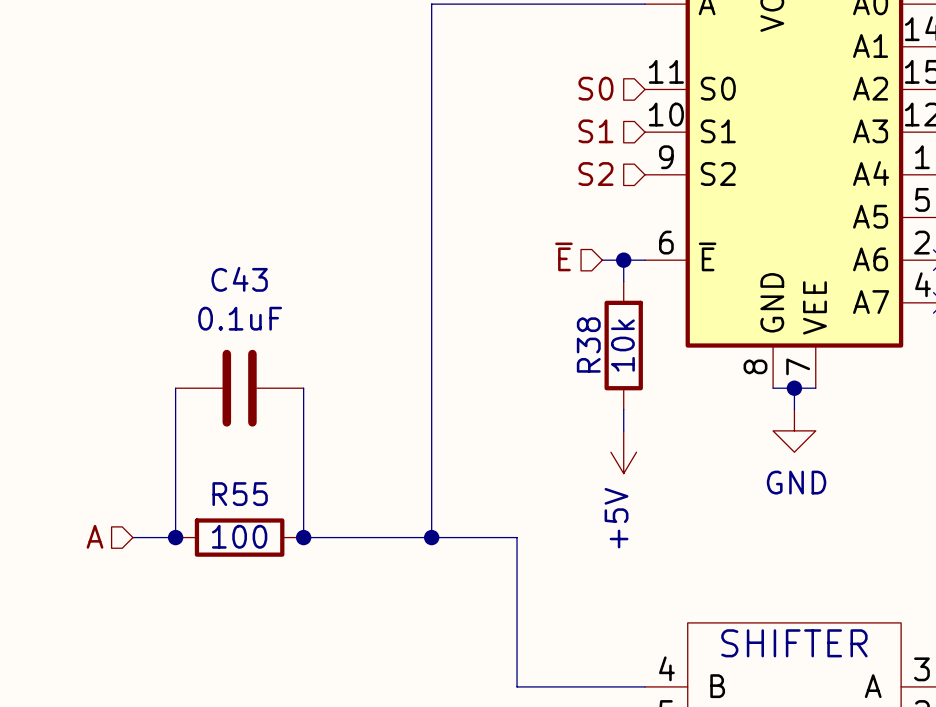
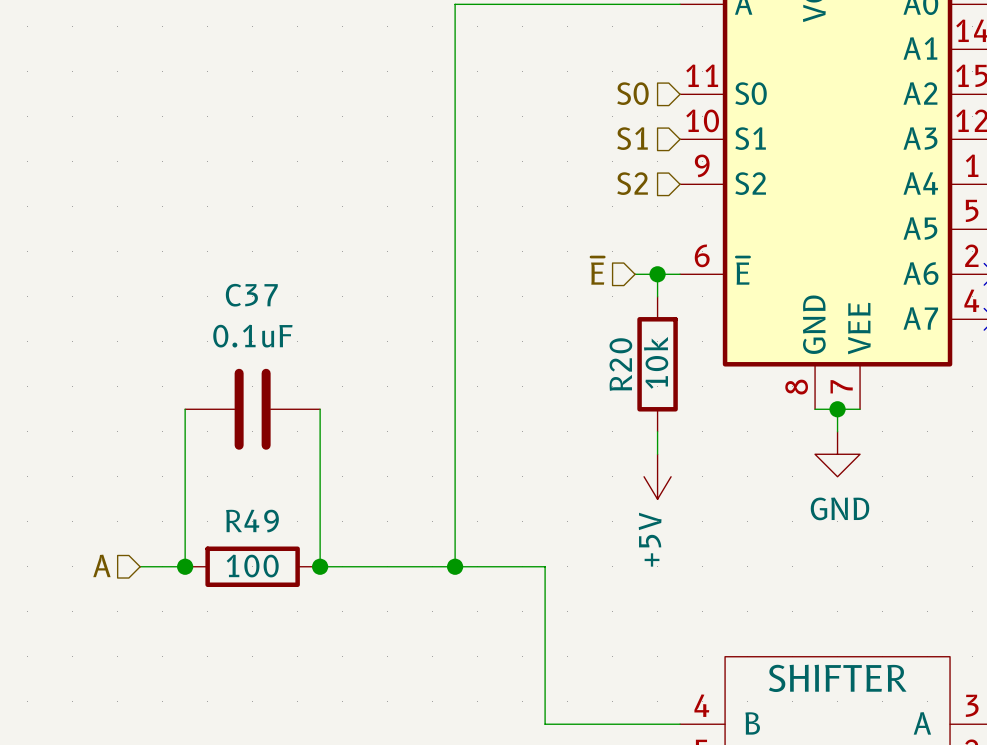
C43 name: C43 (239, 279) -> C37 (251, 295)
R38 name: R38 (588, 345) -> R20 (620, 364)
R55 name: R55 (240, 494) -> R49 (252, 521)

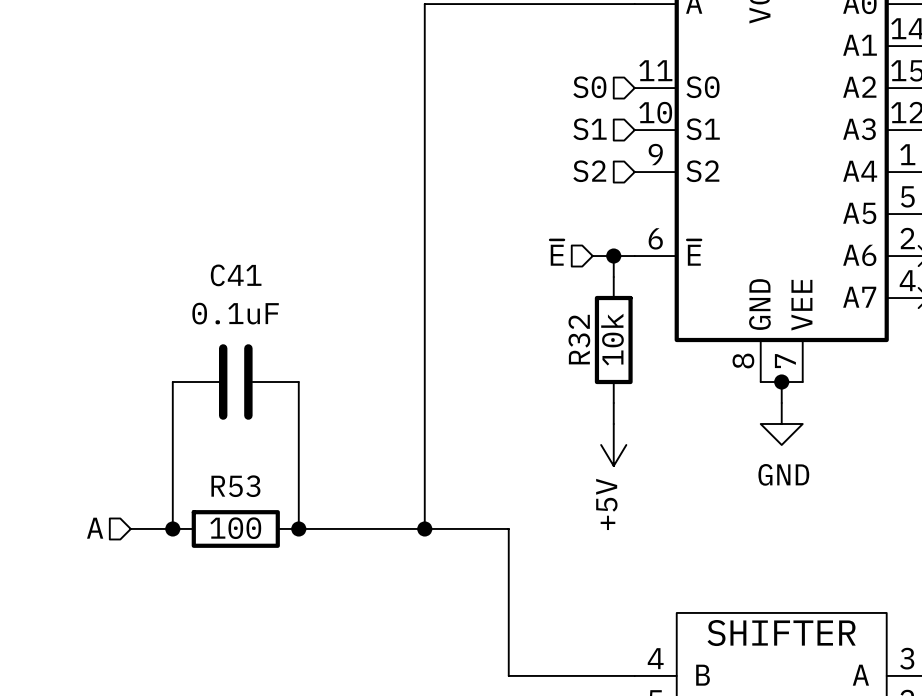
C37 name: C37 (251, 295) -> C41 (236, 275)
R20 name: R20 (620, 364) -> R32 (579, 339)
R49 name: R49 (252, 521) -> R53 (235, 486)

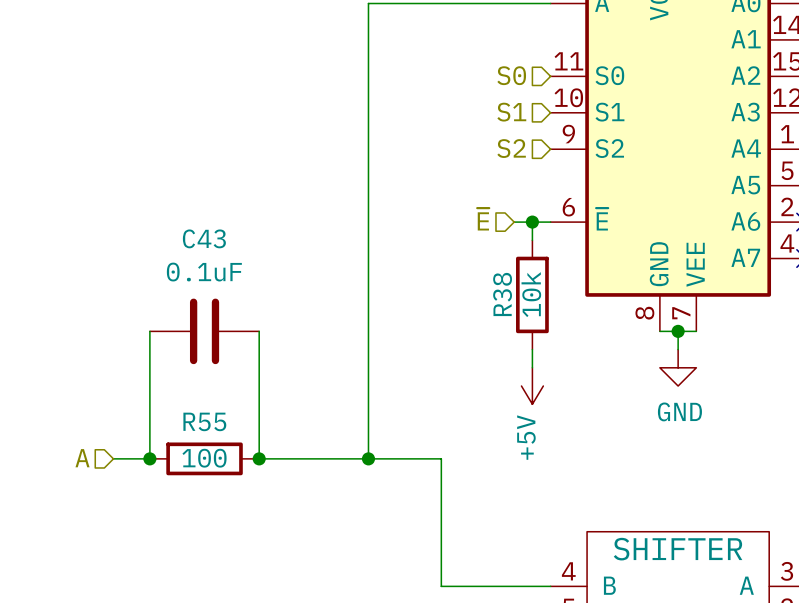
C41 name: C41 (236, 275) -> C43 (204, 238)
R32 name: R32 (579, 339) -> R38 (502, 294)
R53 name: R53 (235, 486) -> R55 (204, 421)

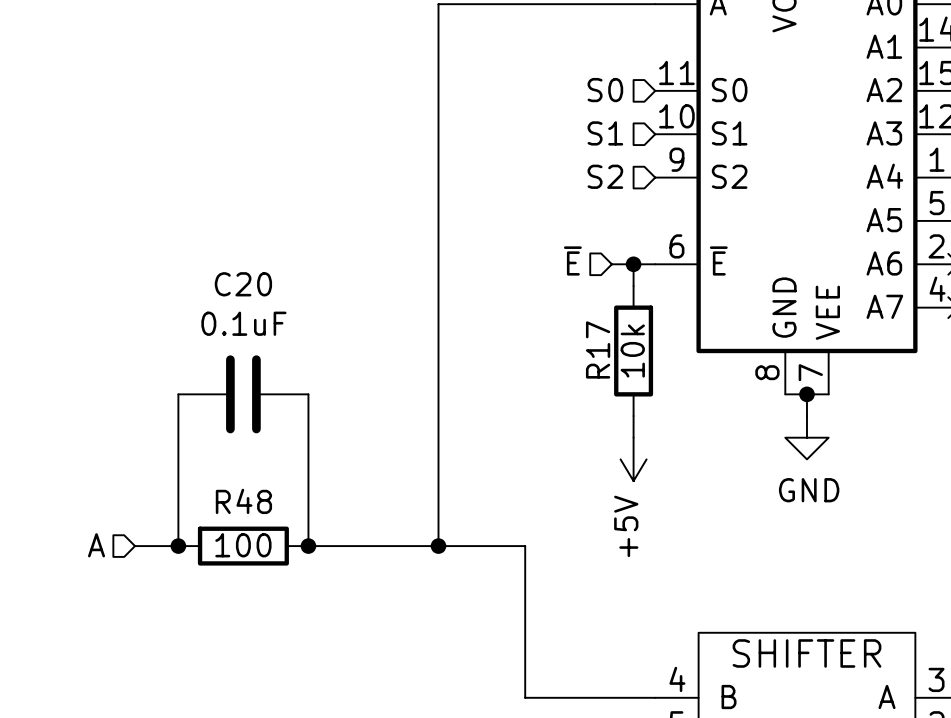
C43 name: C43 (204, 238) -> C20 (243, 284)
R38 name: R38 (502, 294) -> R17 (598, 349)
R55 name: R55 (204, 421) -> R48 (243, 501)

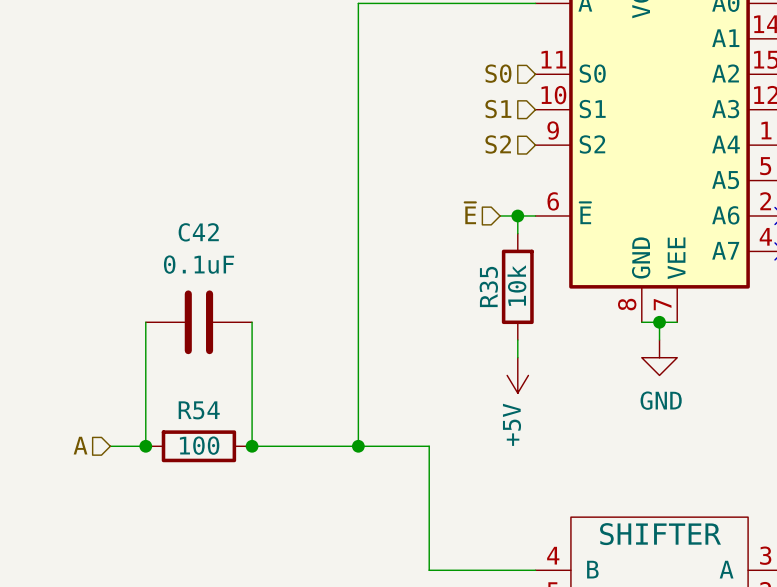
C20 name: C20 (243, 284) -> C42 (198, 232)
R17 name: R17 (598, 349) -> R35 (488, 286)
R48 name: R48 (243, 501) -> R54 (199, 410)

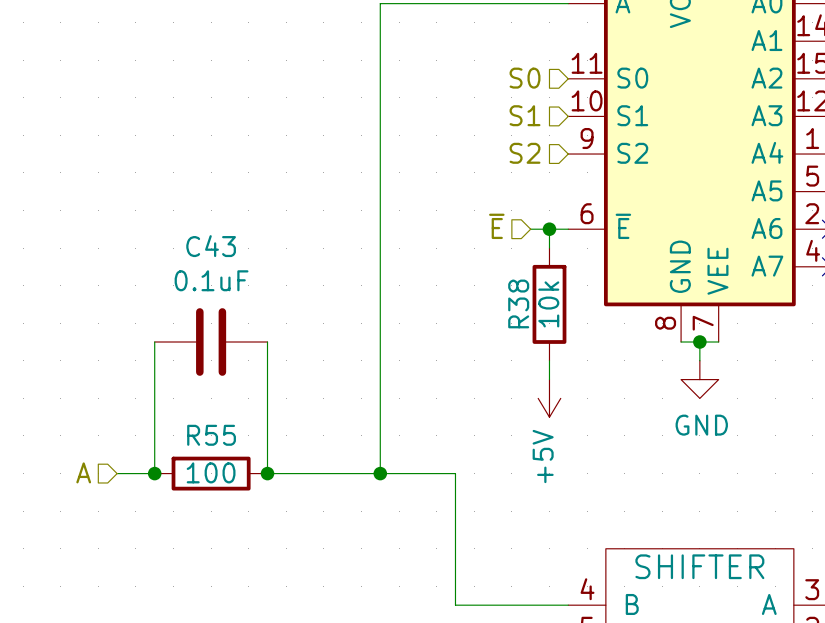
C42 name: C42 (198, 232) -> C43 (211, 246)
R35 name: R35 (488, 286) -> R38 (518, 303)
R54 name: R54 (199, 410) -> R55 (211, 435)

